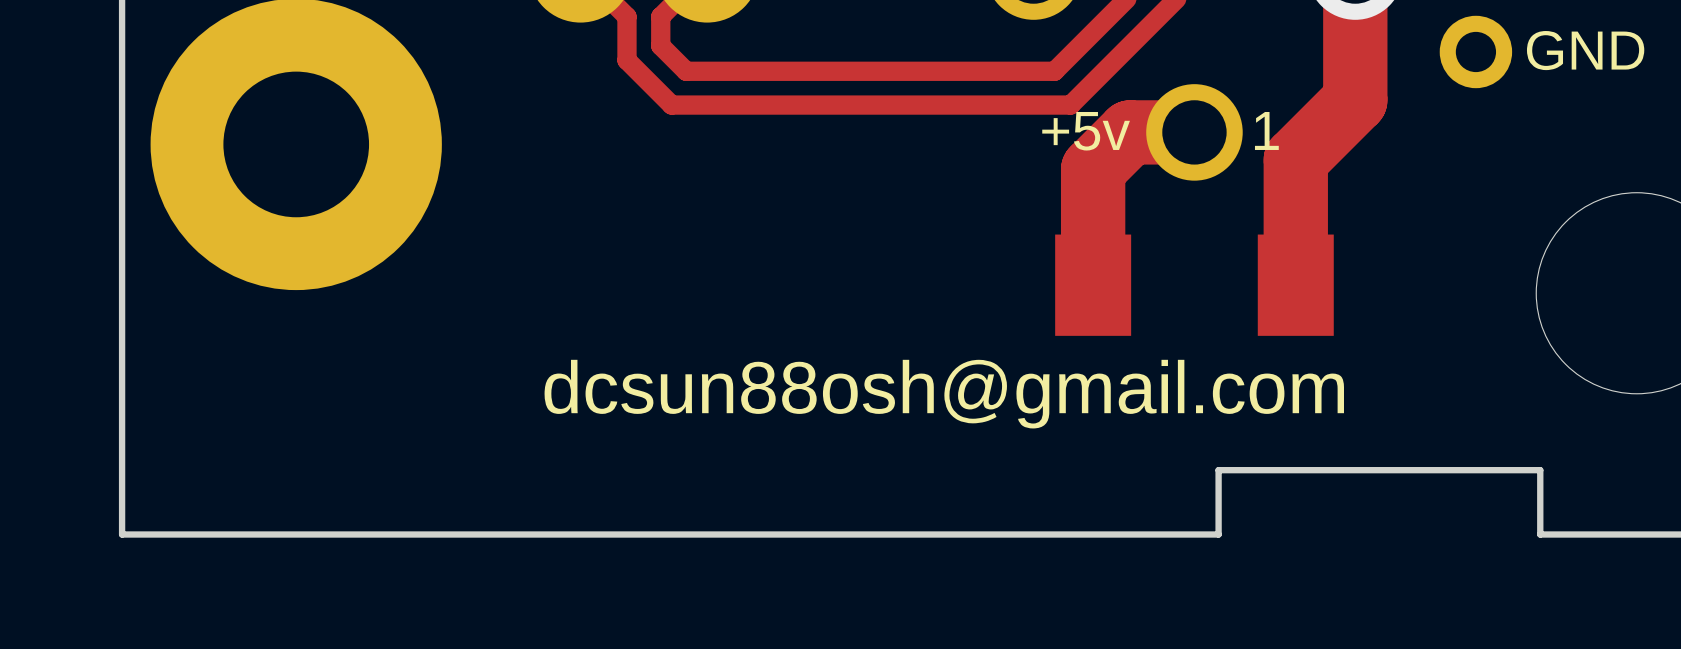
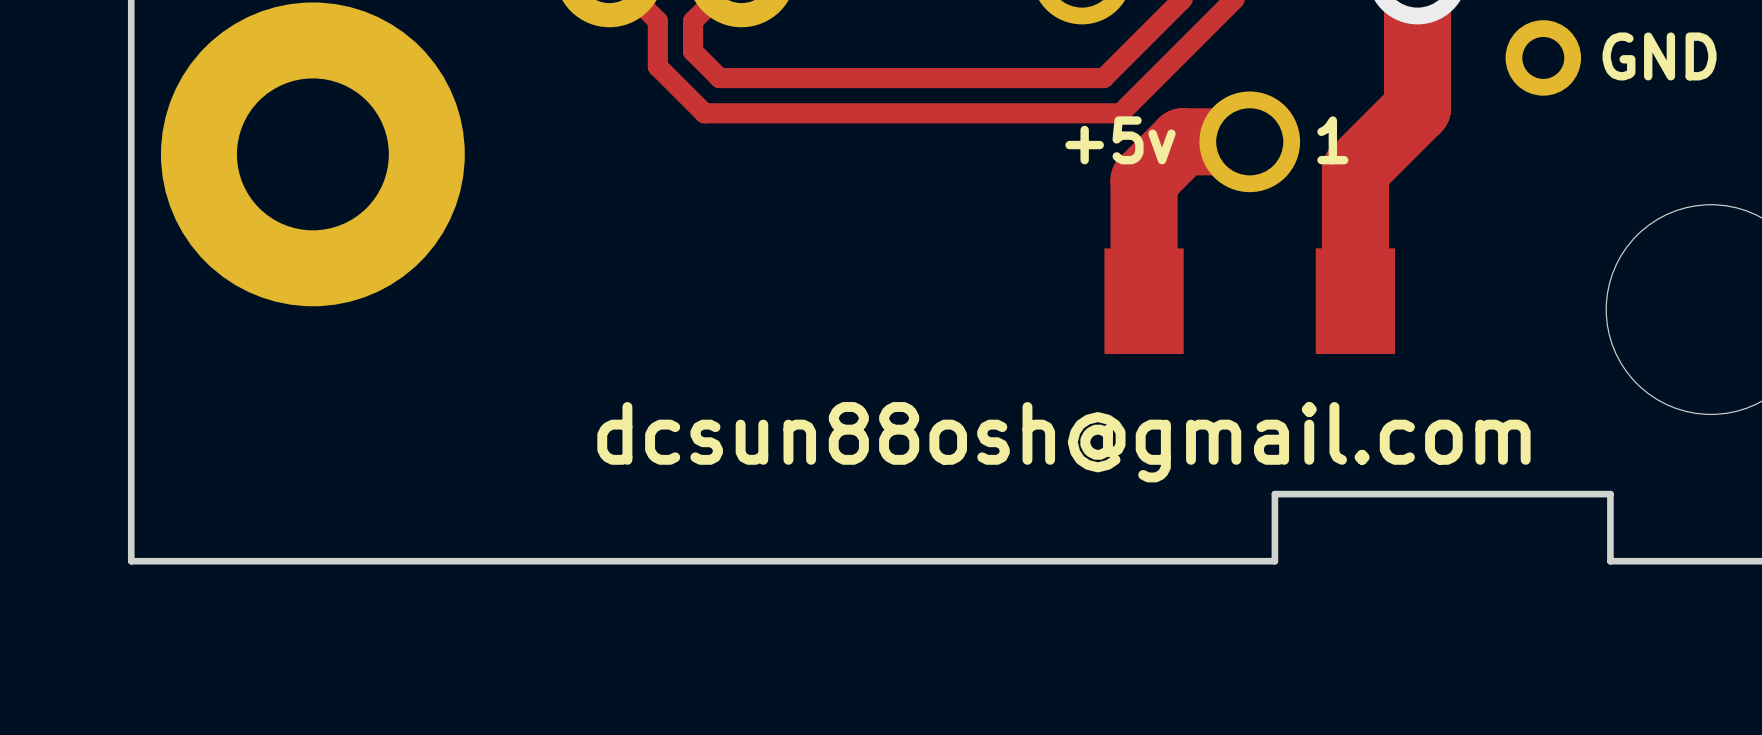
text position: dcsun88osh@gmail.com (944, 394) -> dcsun88osh@gmail.com (1063, 442)

